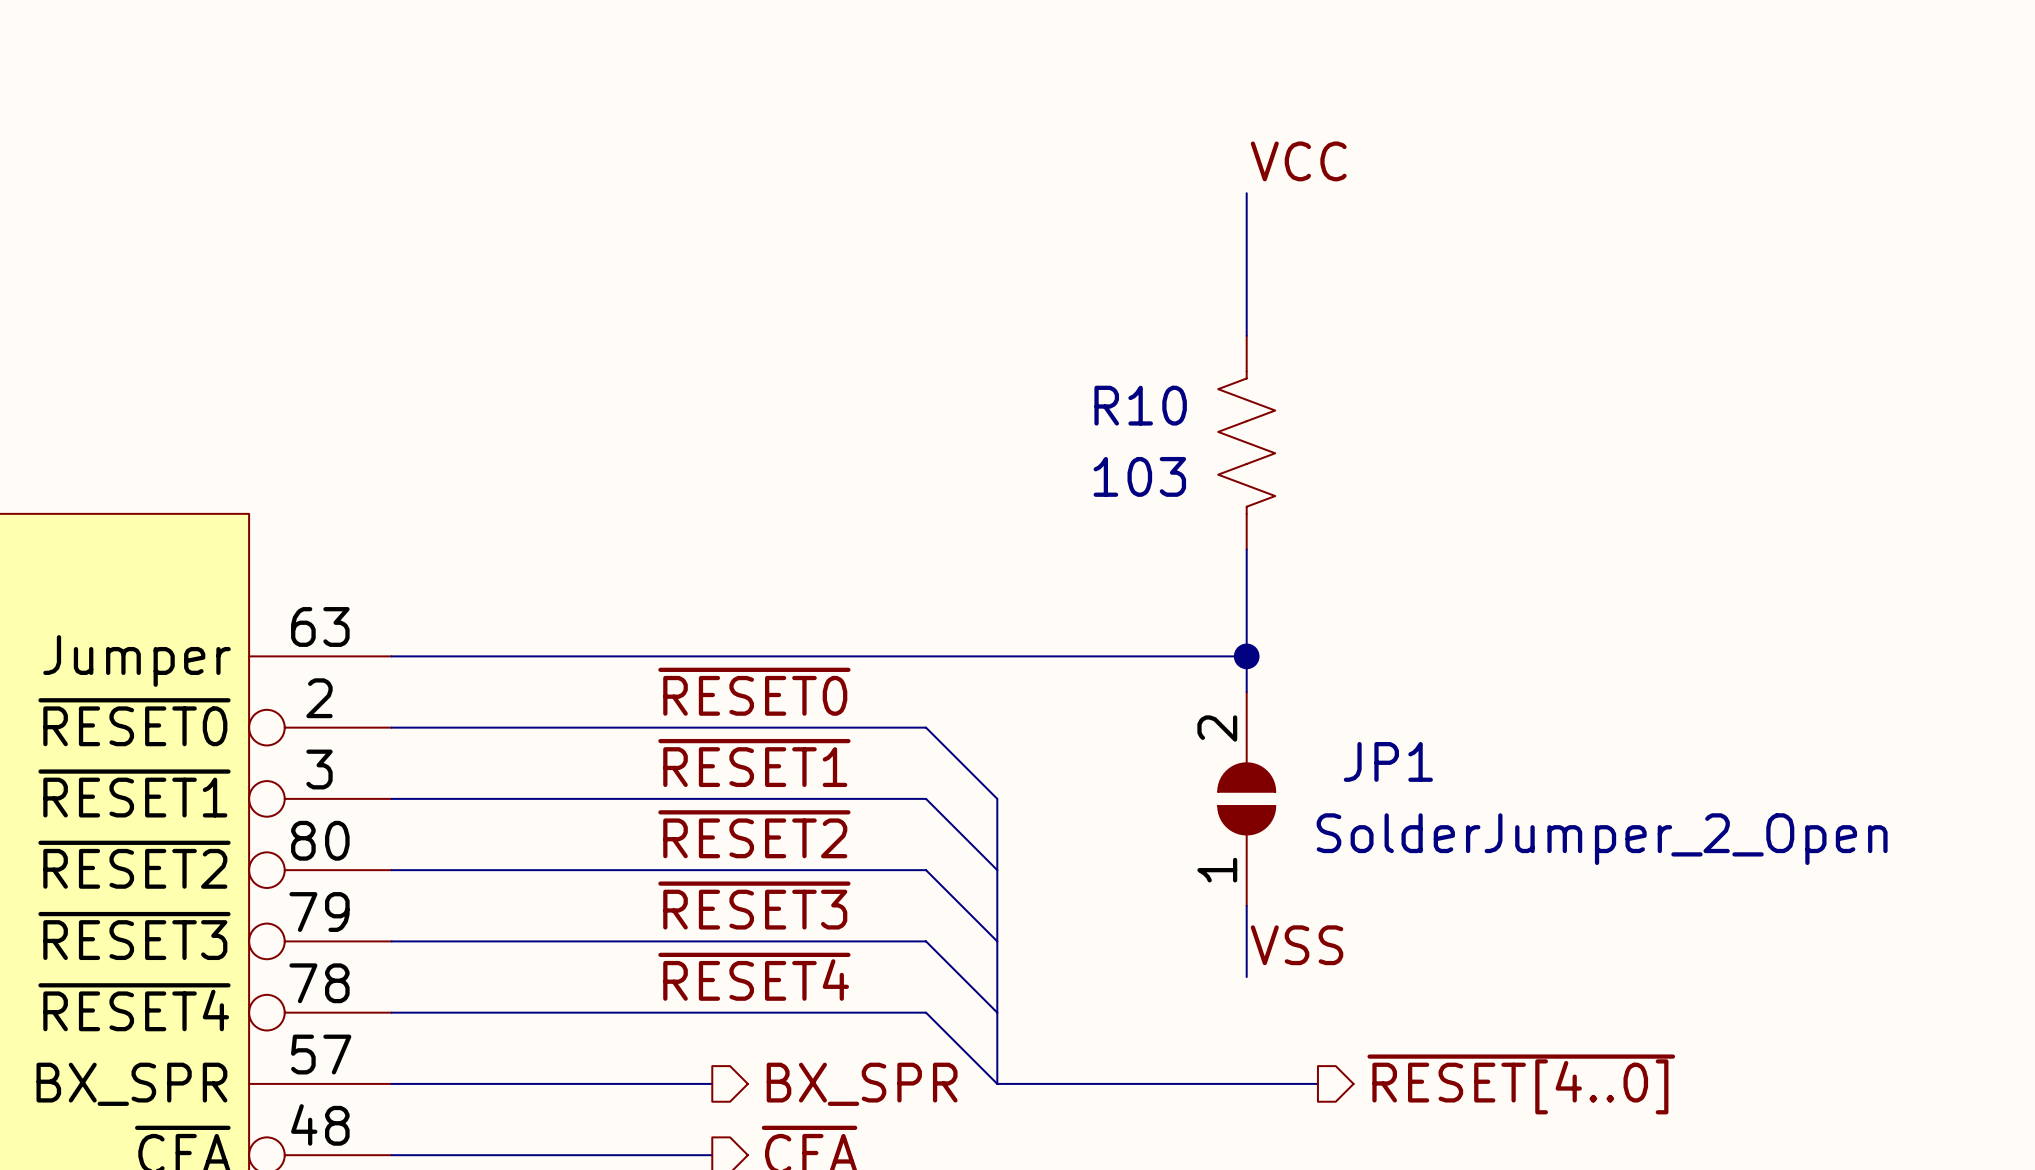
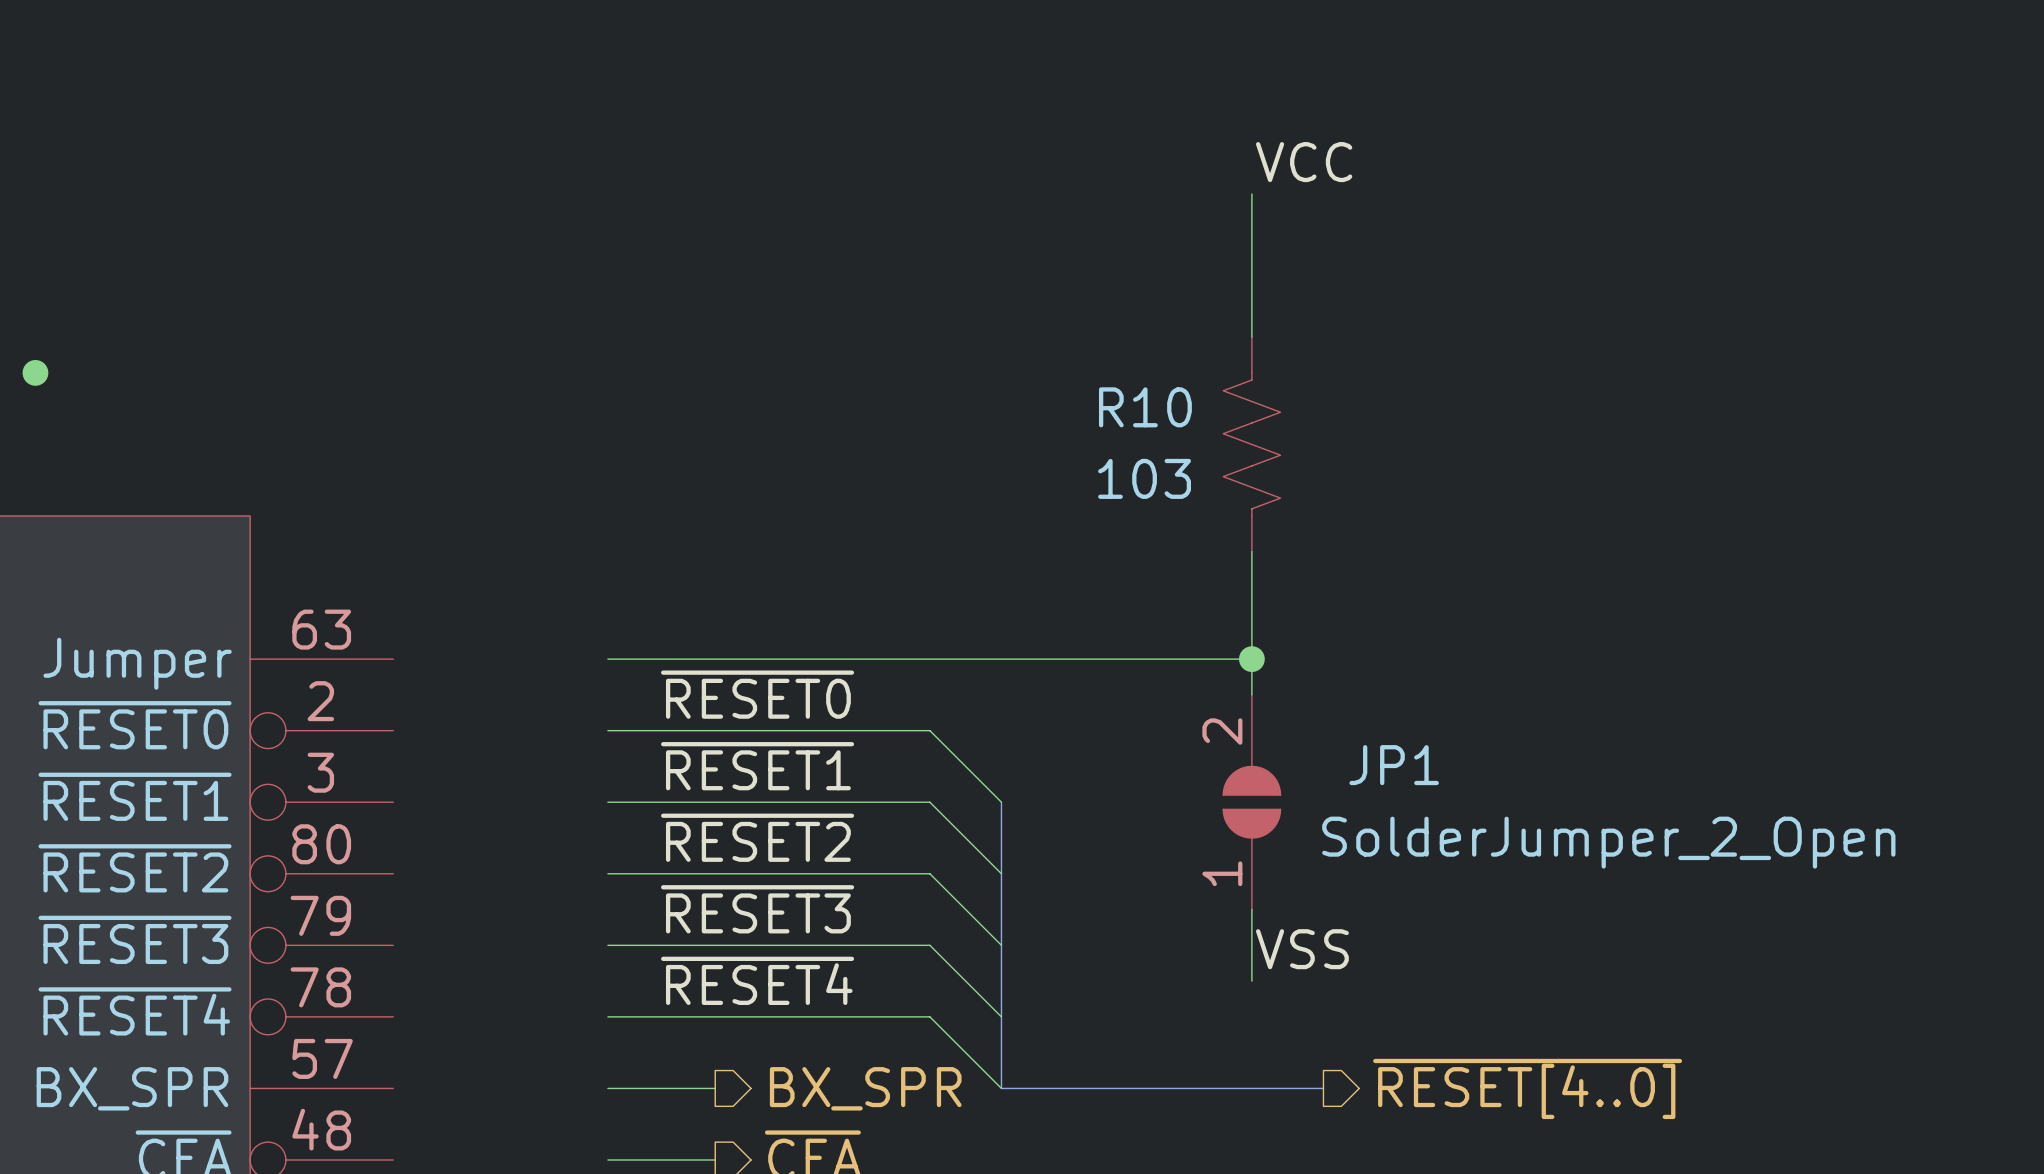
junction: none -> (35, 372)
wire: (391, 656) (605, 656) -> none
wire: (391, 727) (605, 727) -> none
wire: (391, 798) (605, 798) -> none
wire: (391, 870) (605, 870) -> none
wire: (391, 941) (605, 941) -> none
wire: (391, 1012) (605, 1012) -> none
wire: (391, 1083) (605, 1083) -> none
wire: (391, 1155) (605, 1155) -> none

